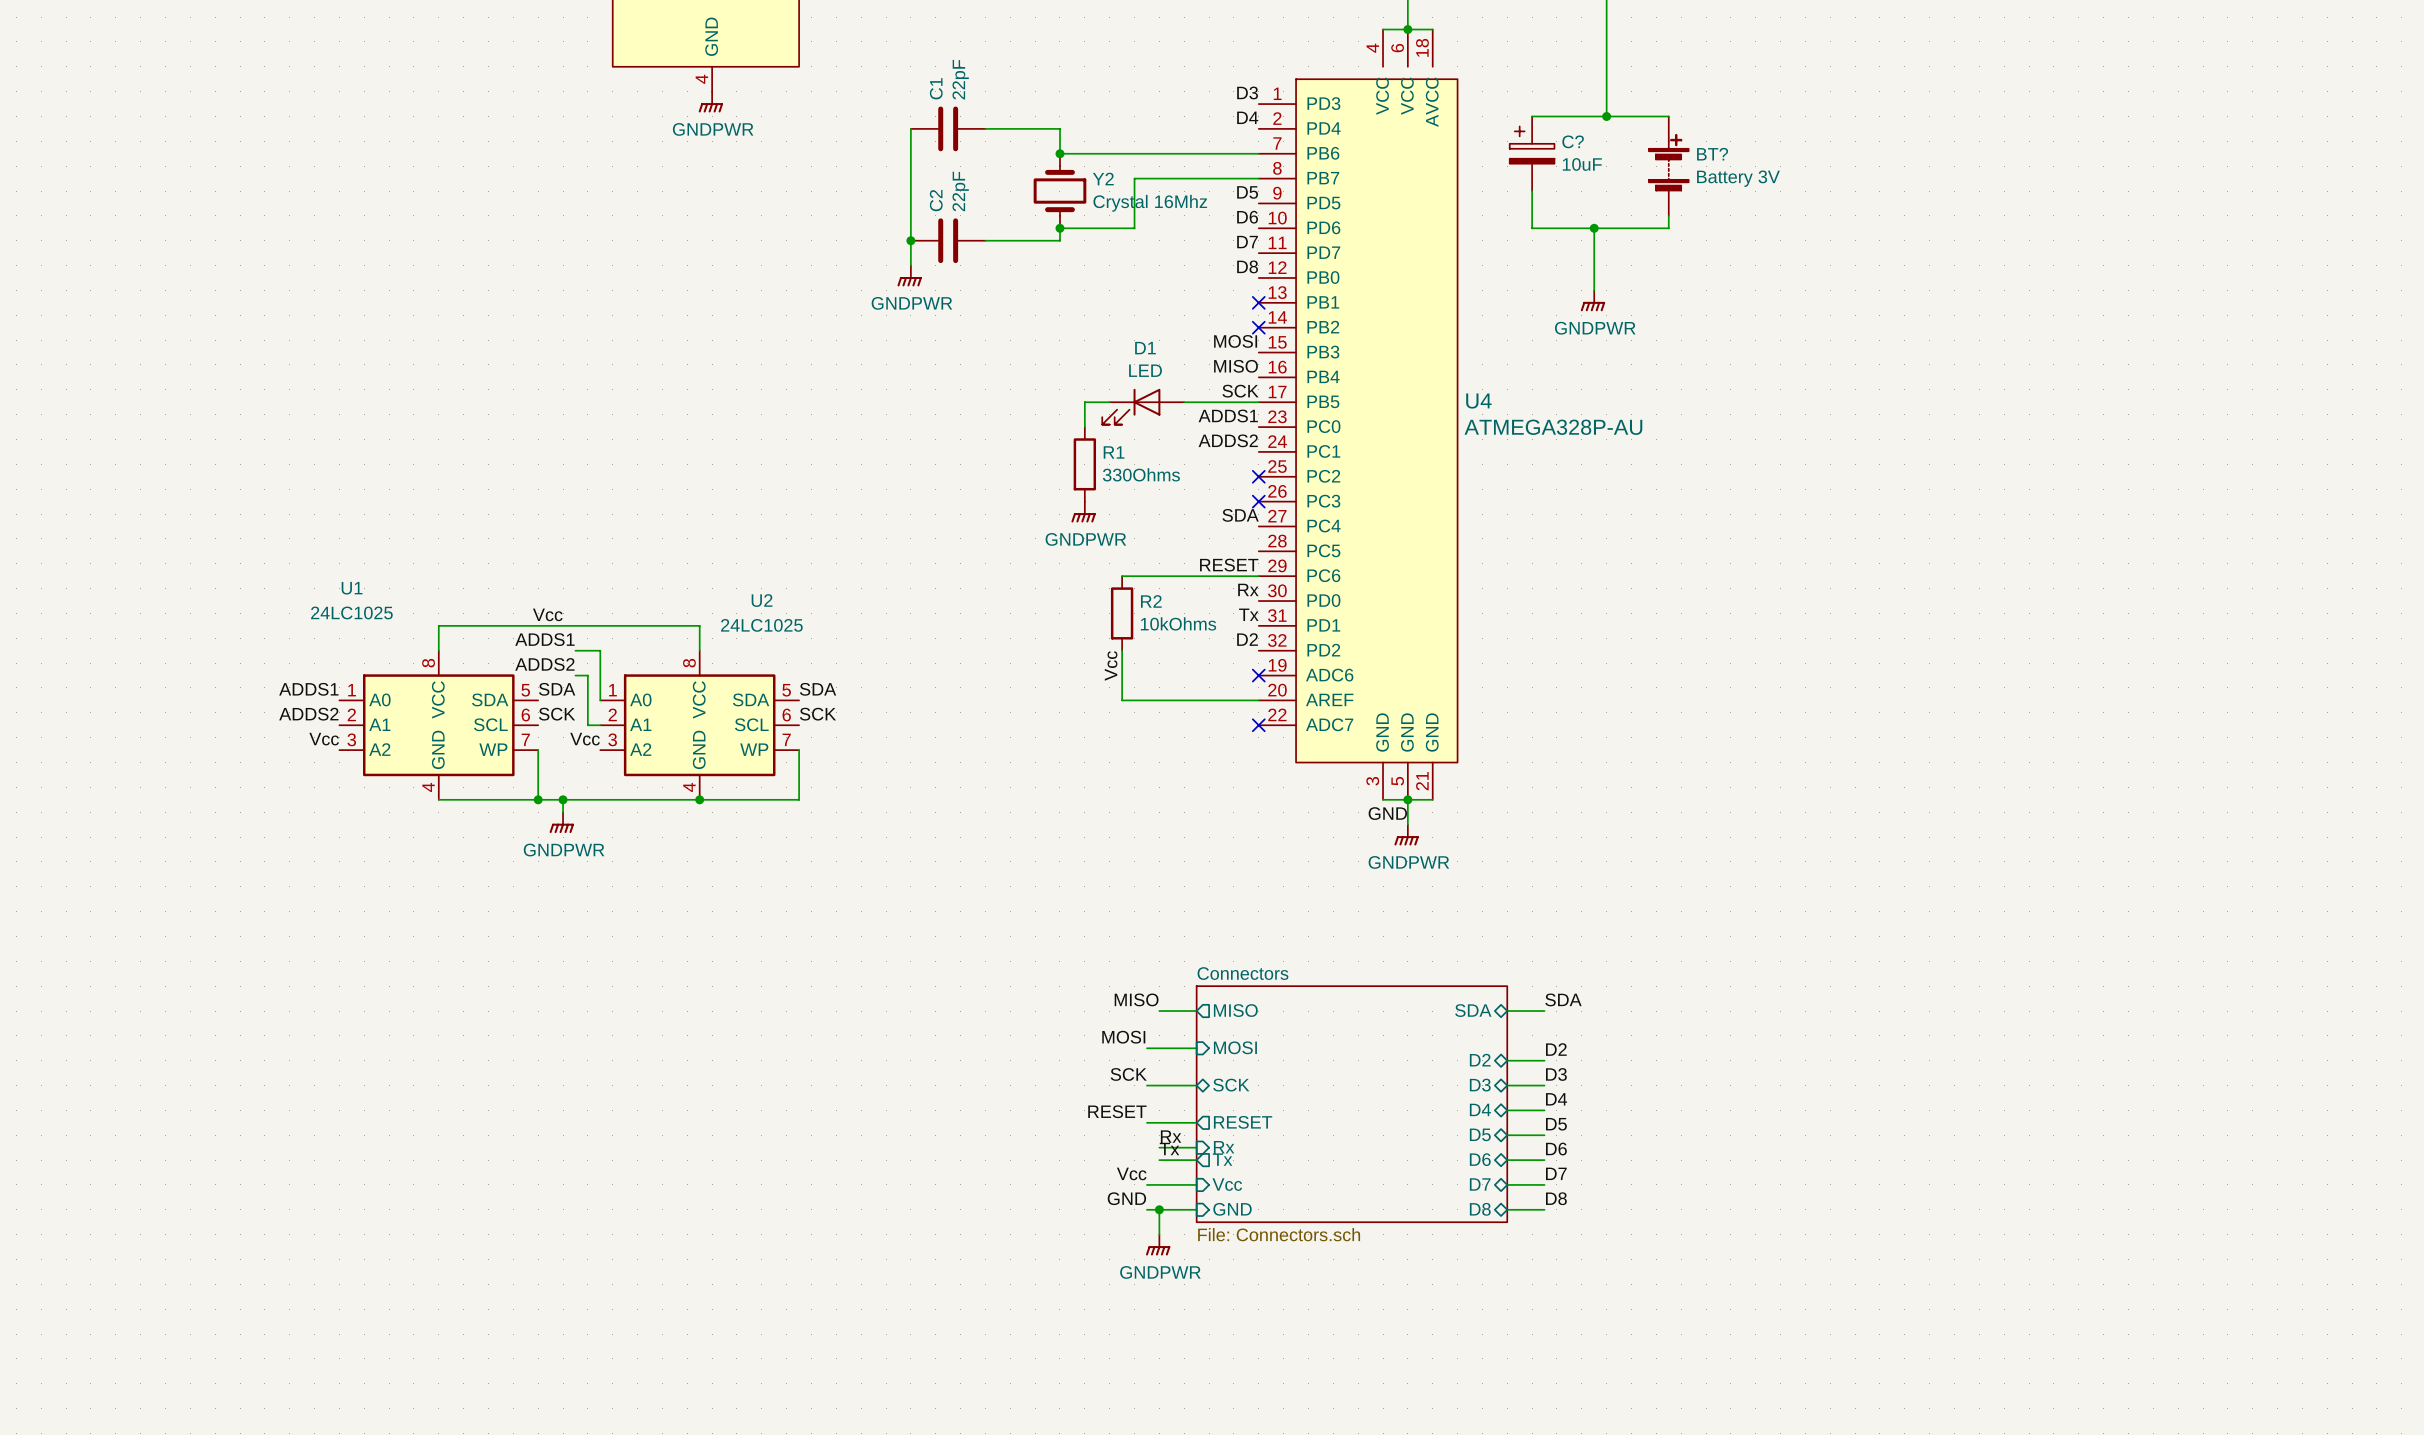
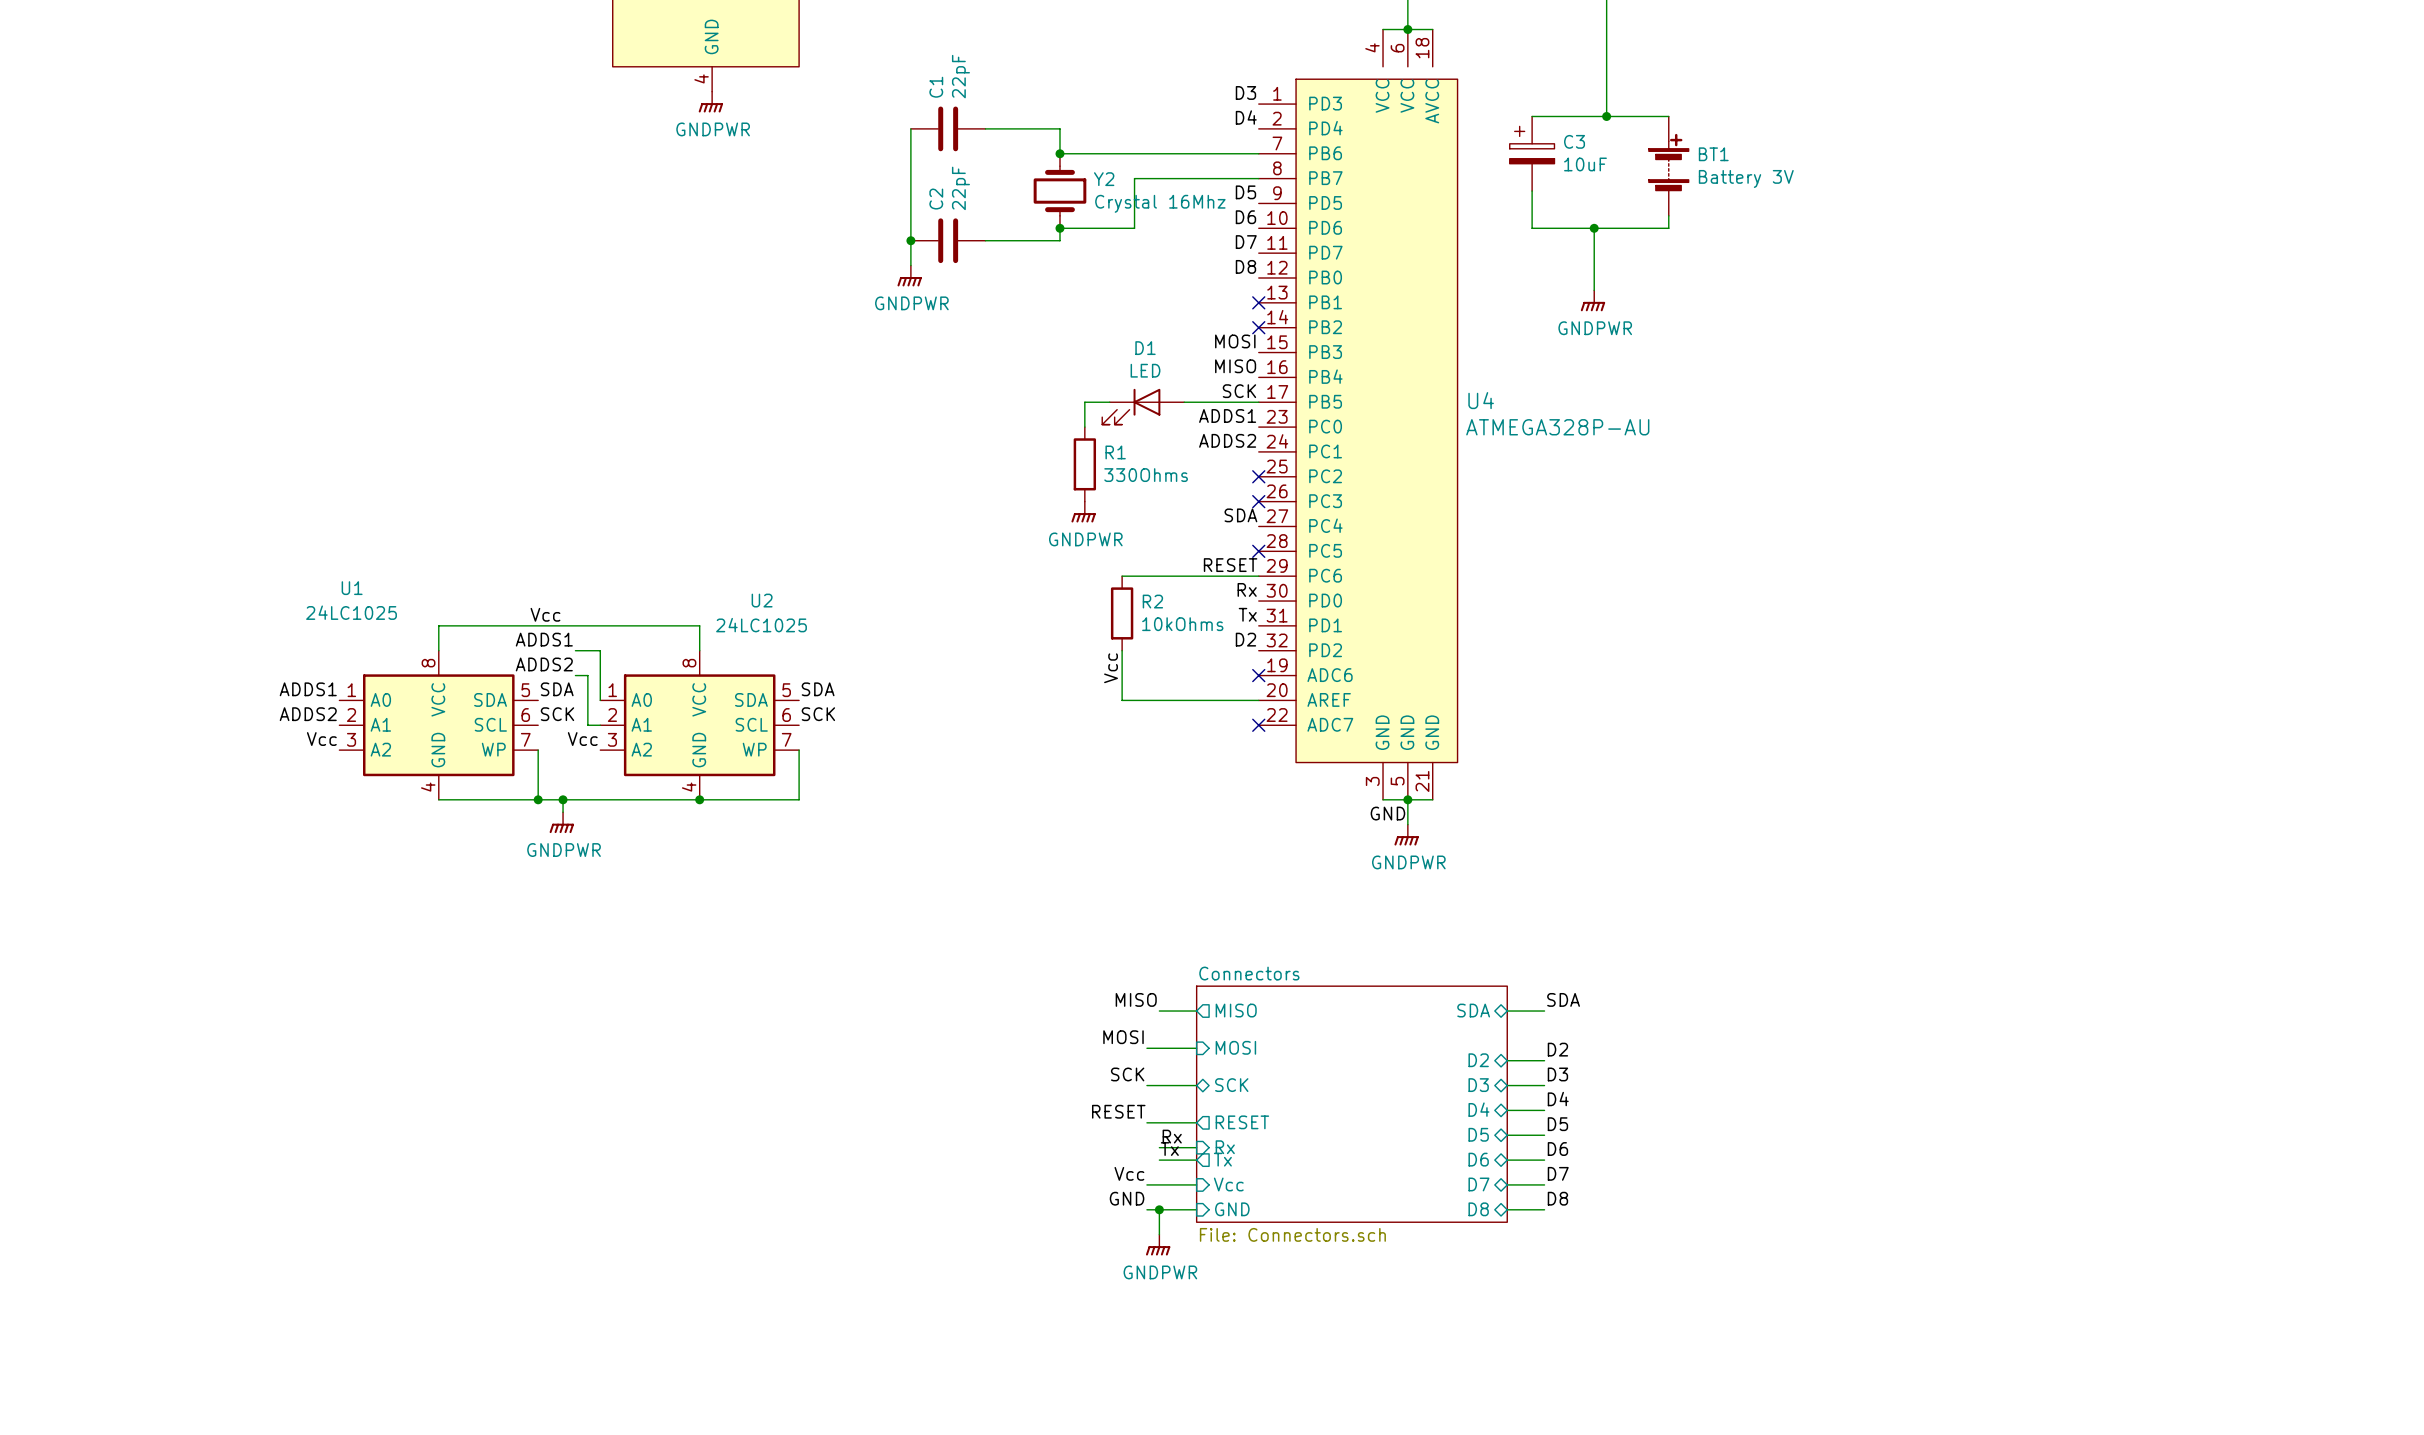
C? name: C? (1573, 141) -> C3 (1574, 141)
BT? name: BT? (1712, 154) -> BT1 (1713, 154)
no-connect mark: none -> (1258, 551)

